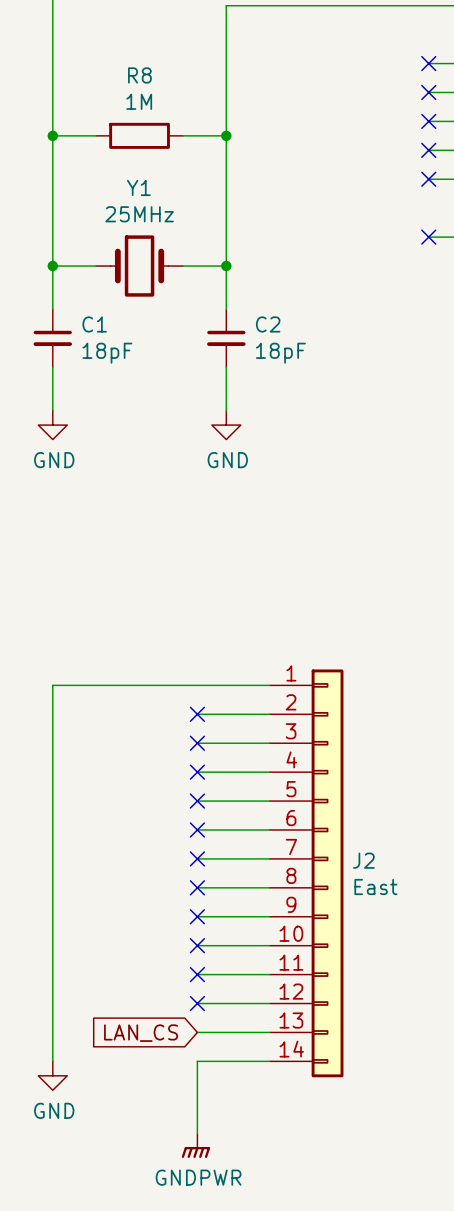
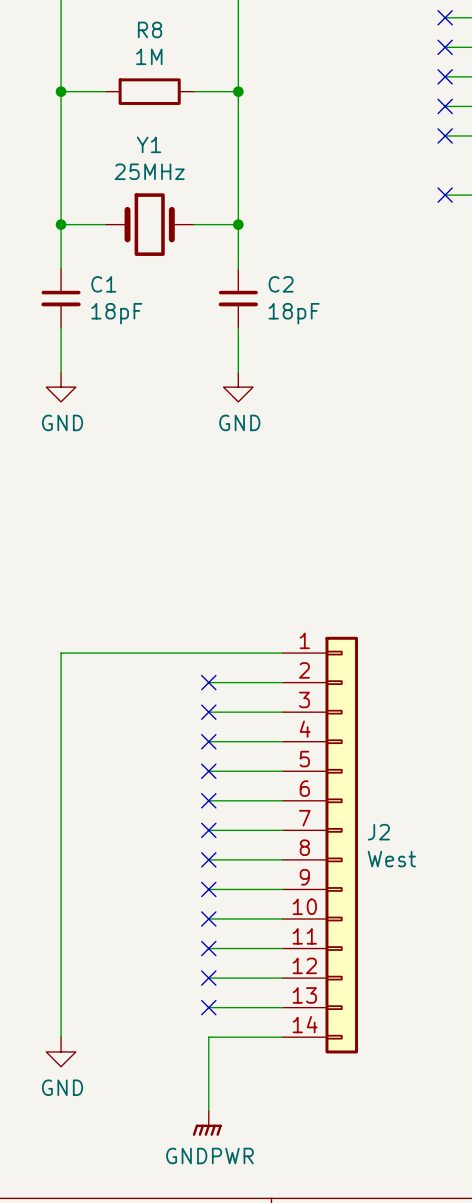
J2 value: East (375, 887) -> West (391, 859)
no-connect mark: none -> (208, 1007)
global label: LAN_CS (141, 1033) -> none

